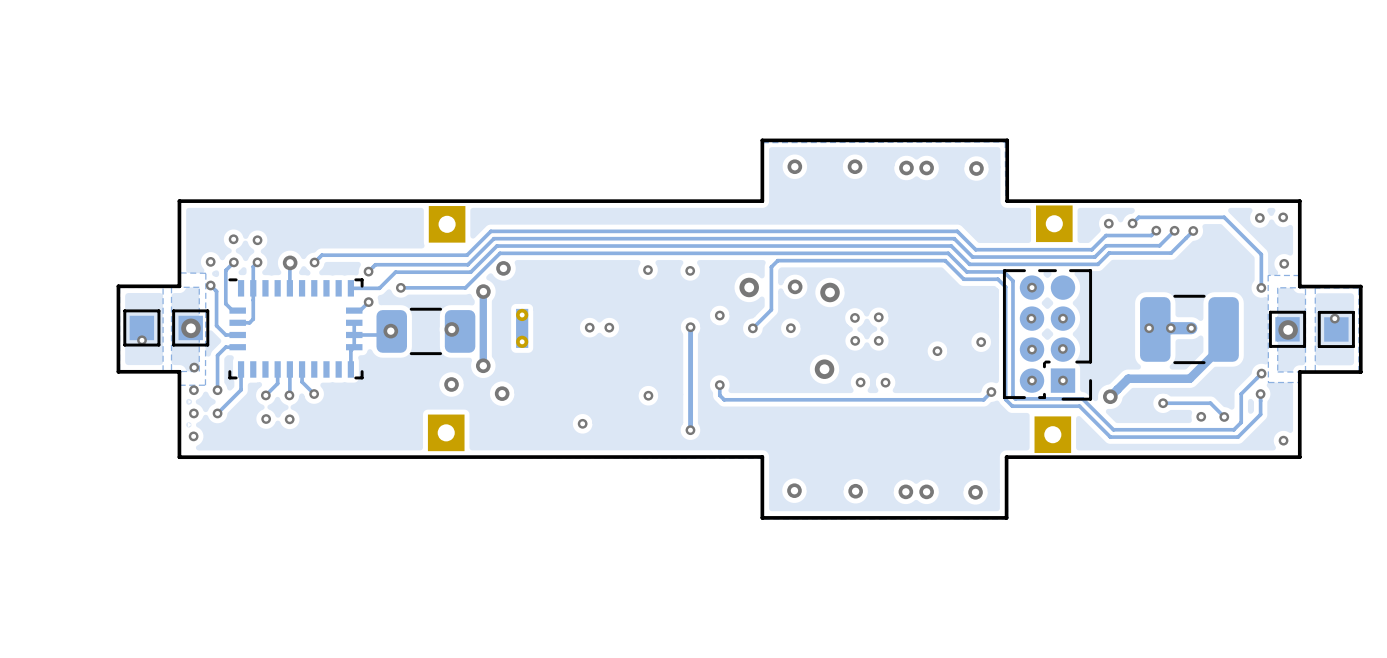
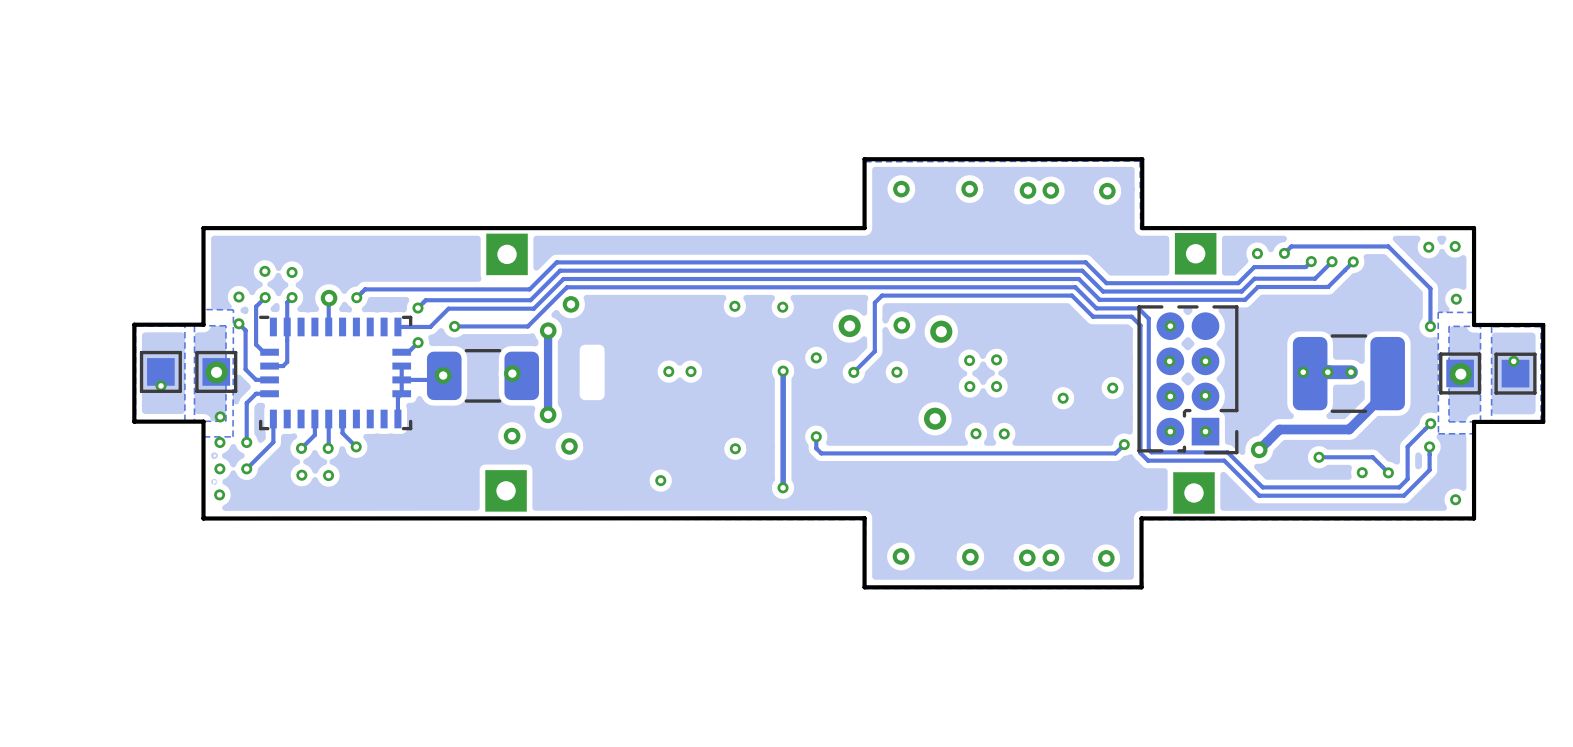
part: (522, 328) -> none

